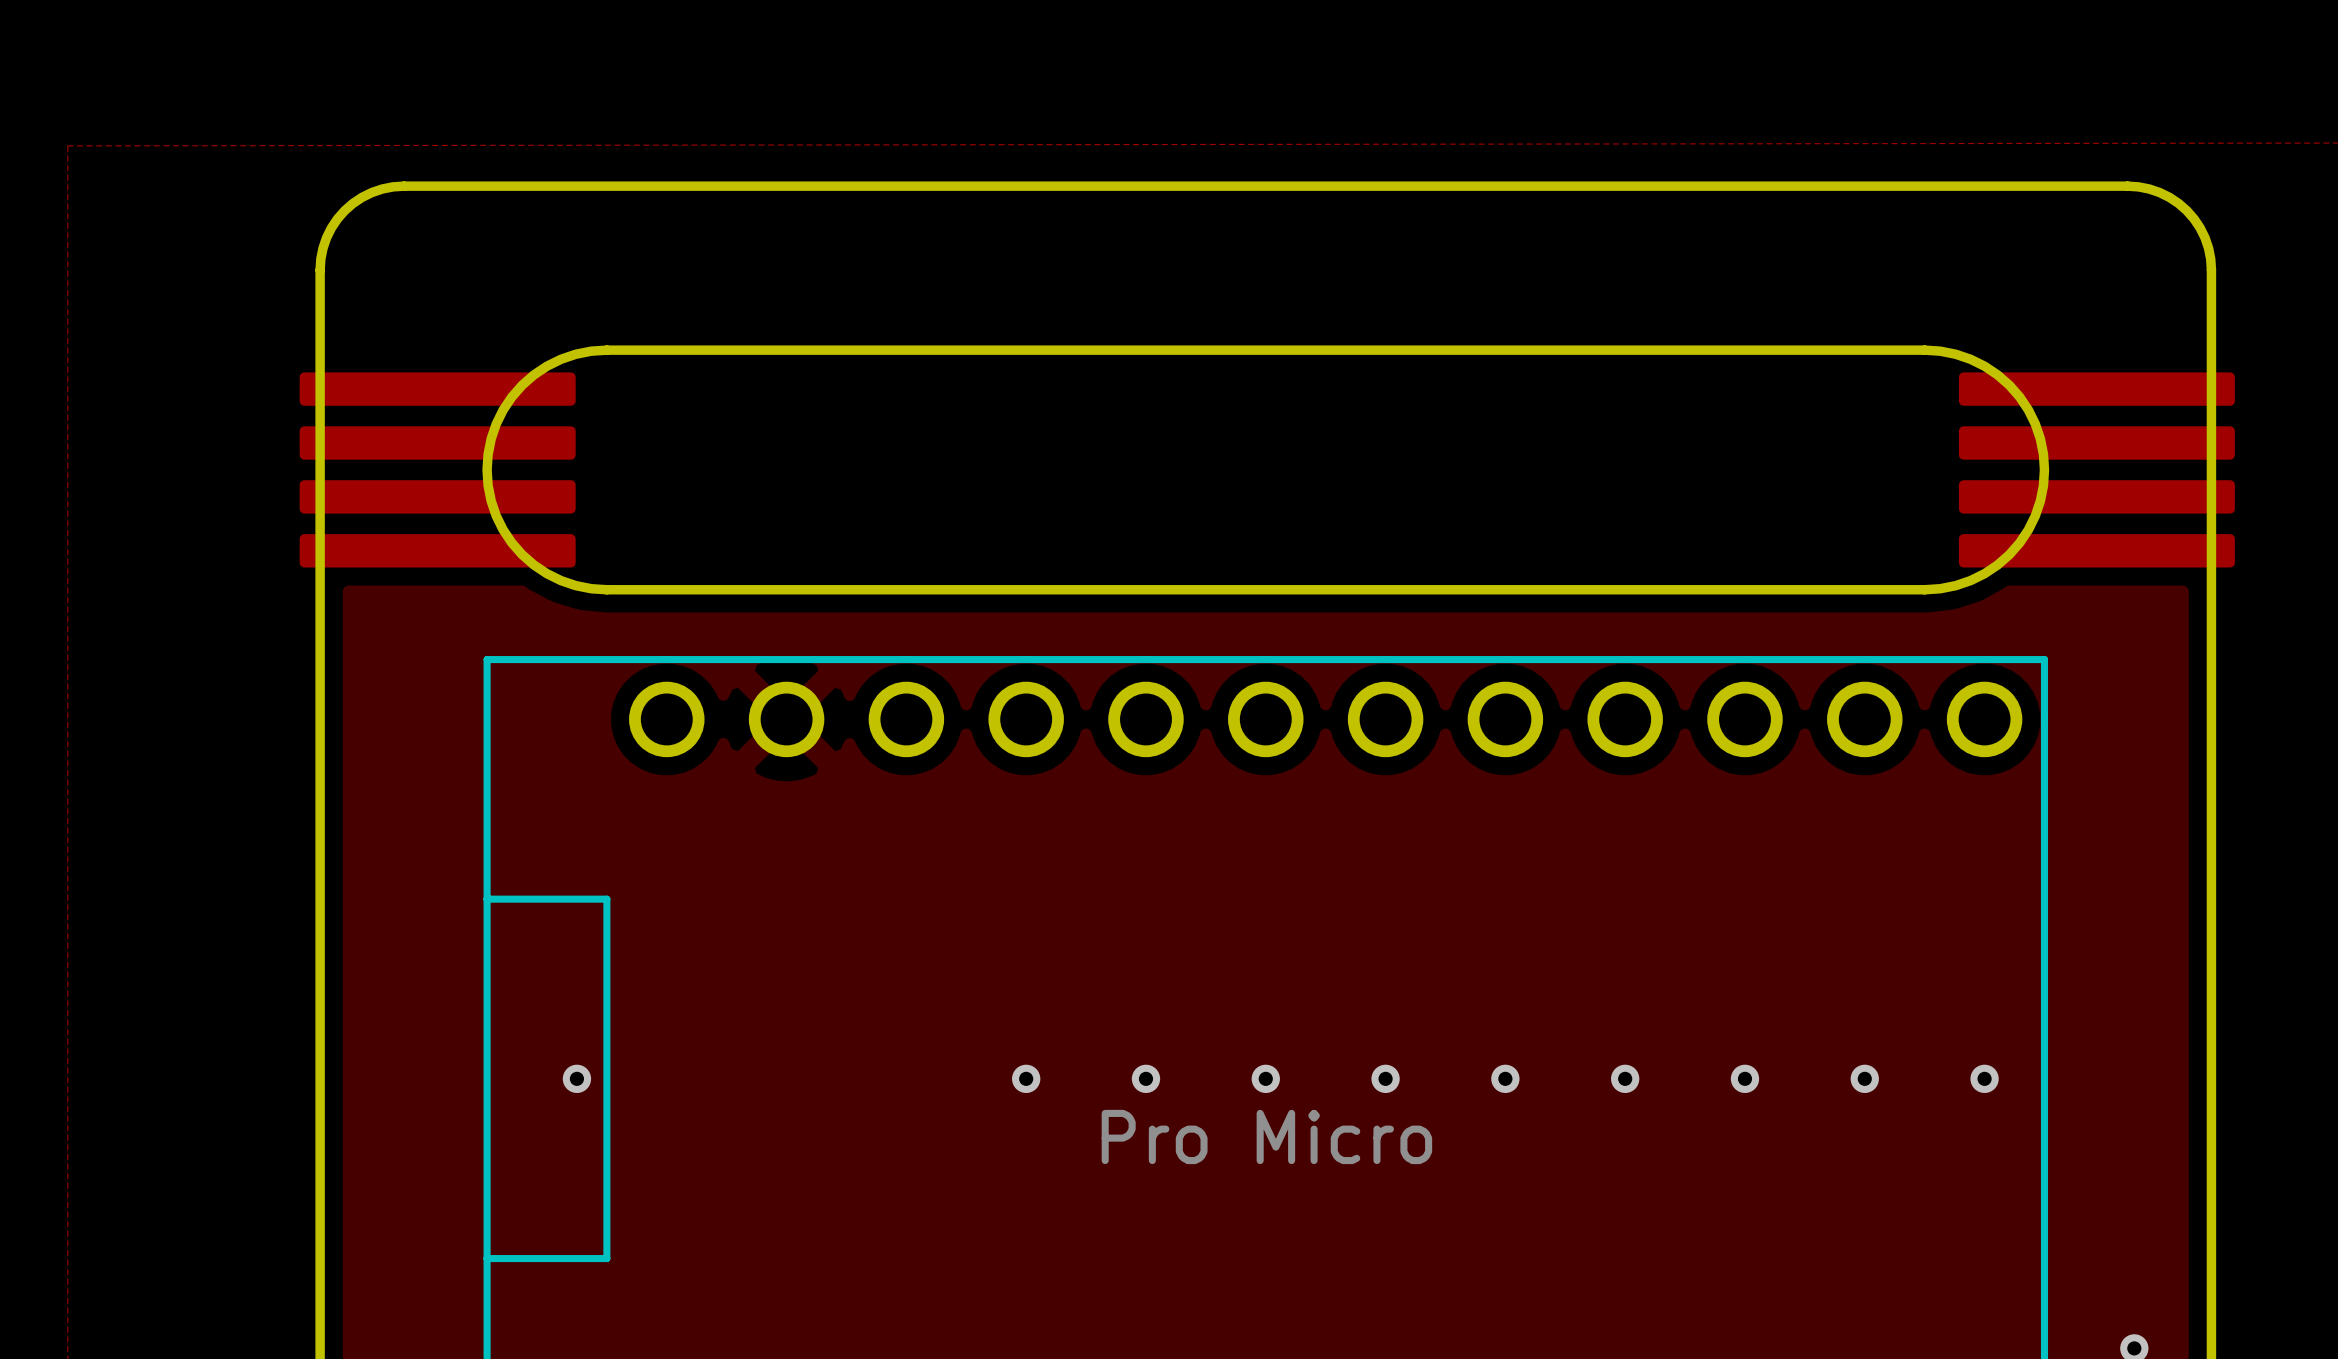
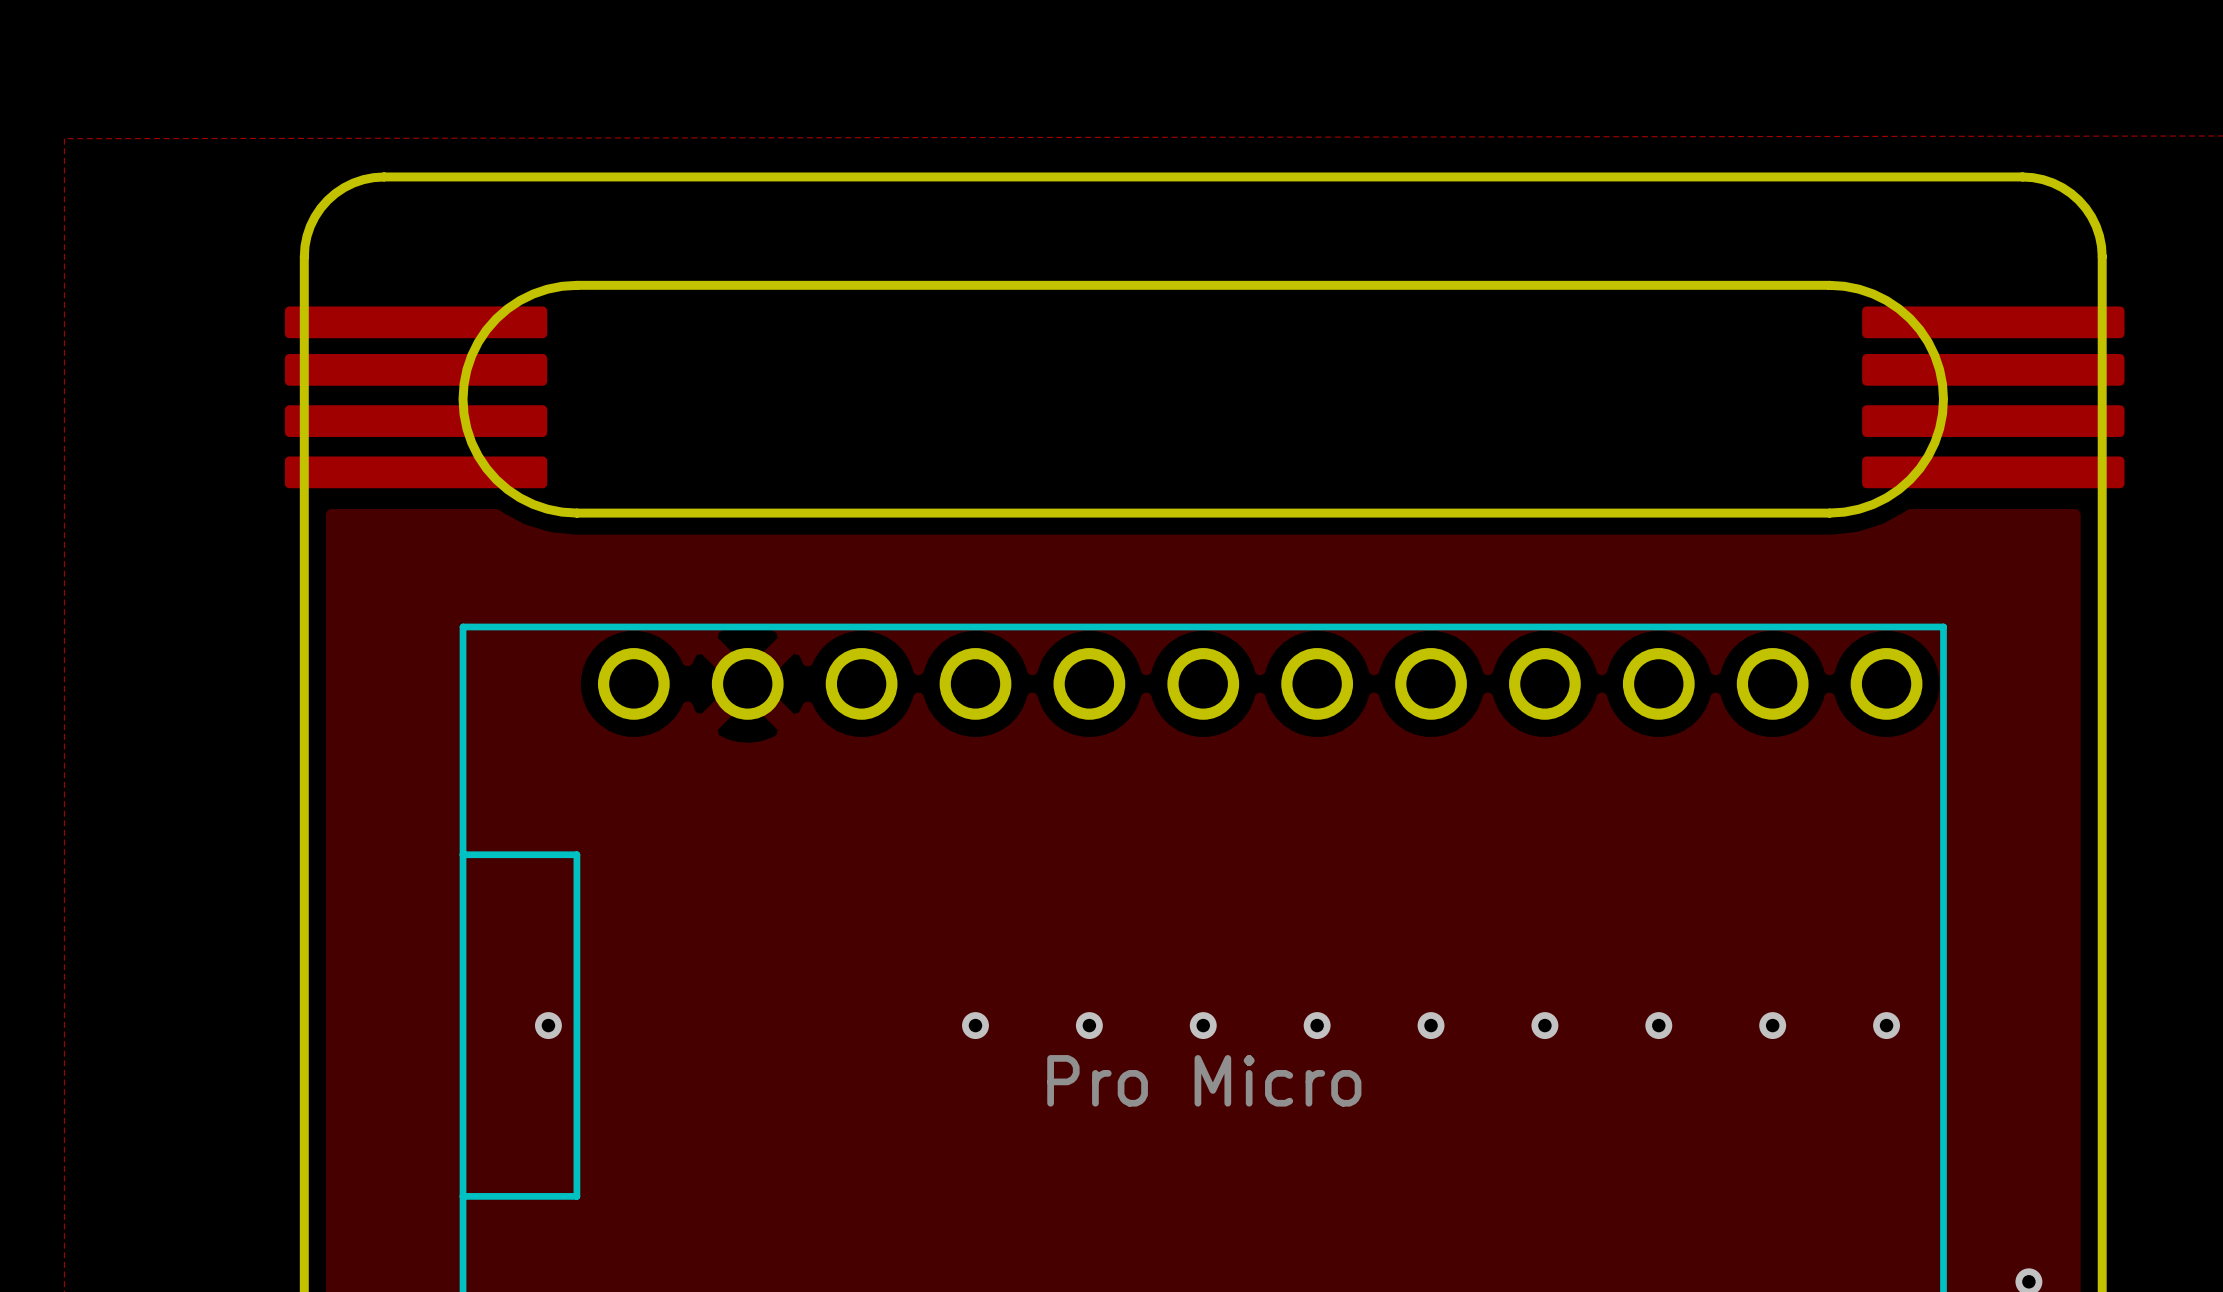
board edge: (606, 350) (1940, 351) (1955, 354) (1984, 366) (2009, 385) (2019, 397) (2035, 424) (2040, 438) (2043, 454) (2043, 485) (2035, 515) (2019, 542) (2009, 554) (1984, 573) (1955, 585) (1940, 588) (591, 588) (575, 585) (546, 573) (522, 554) (511, 542) (496, 515) (491, 500) (487, 469) (491, 438) (496, 424) (511, 397) (522, 385) (546, 366) (561, 359) (575, 354) (606, 350) -> (576, 285) (1844, 286) (1873, 294) (1886, 300) (1898, 308) (1919, 329) (1928, 342) (1939, 369) (1942, 384) (1942, 414) (1939, 428) (1928, 456) (1910, 479) (1898, 489) (1873, 504) (1844, 512) (562, 512) (533, 504) (507, 489) (496, 479) (486, 468) (471, 442) (466, 428) (463, 399) (466, 369) (471, 355) (478, 342) (496, 318) (507, 308) (533, 294) (547, 289) (576, 285)
drawing position: (437, 550) -> (416, 322)
drawing position: (2096, 550) -> (1993, 322)

